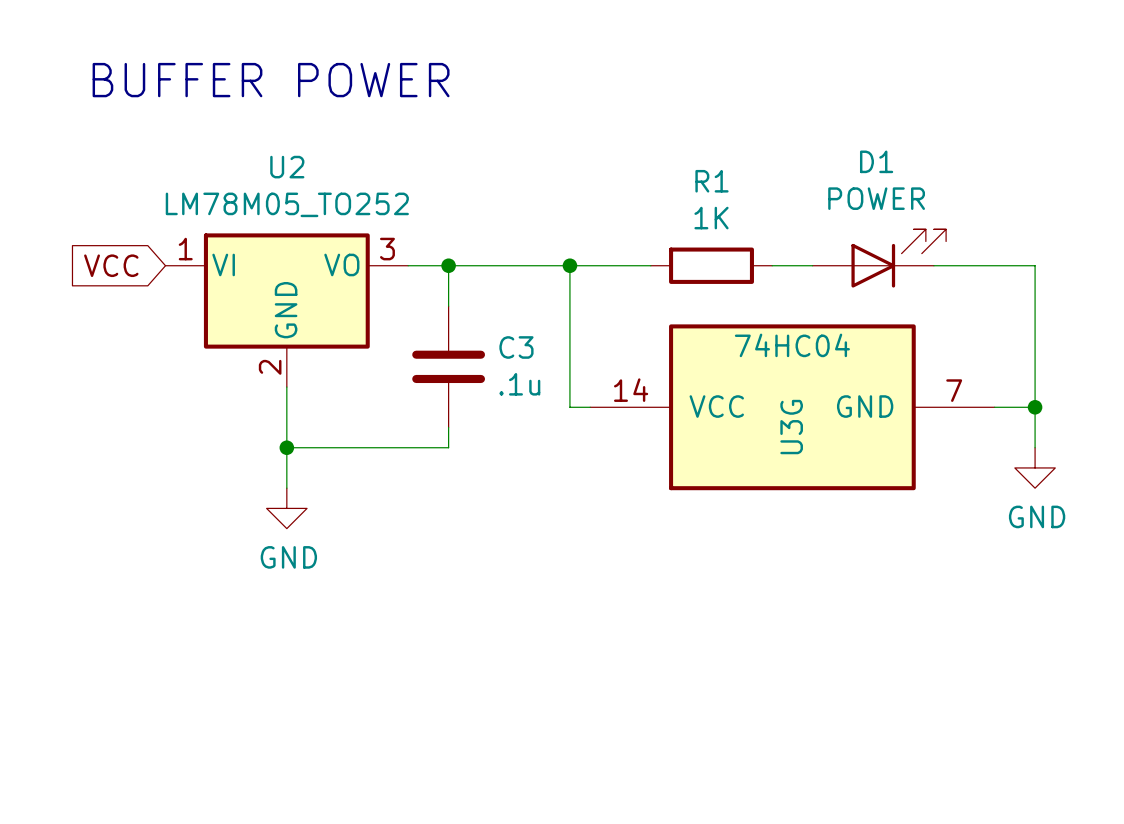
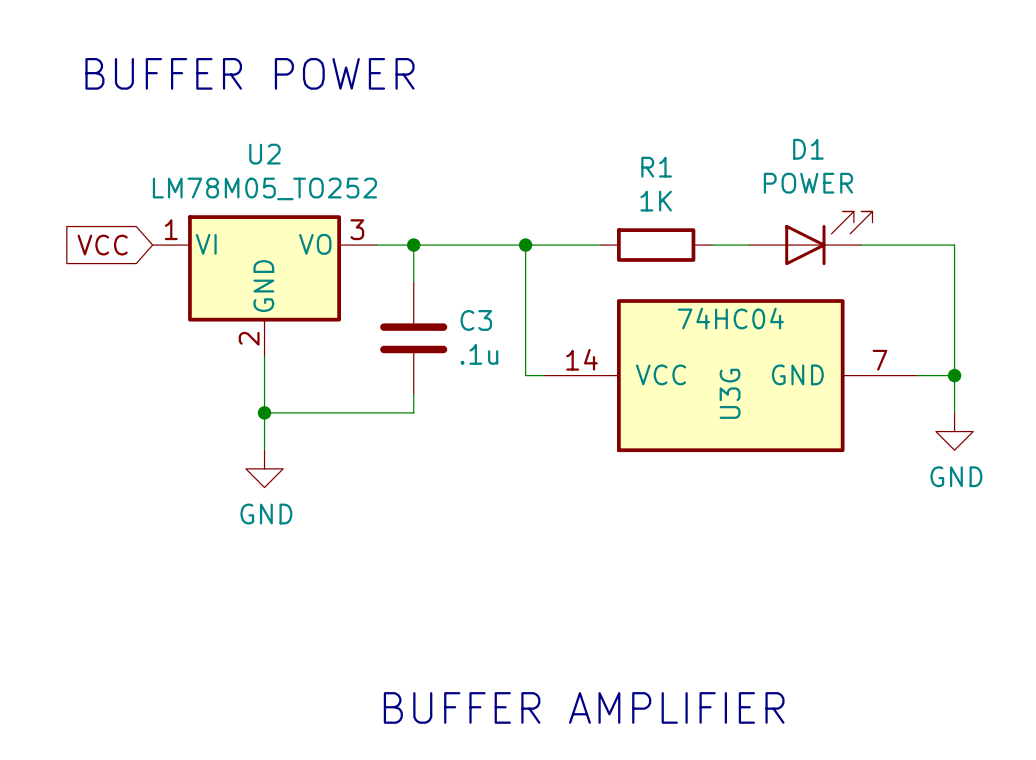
text: none -> BUFFER AMPLIFIER (584, 707)

